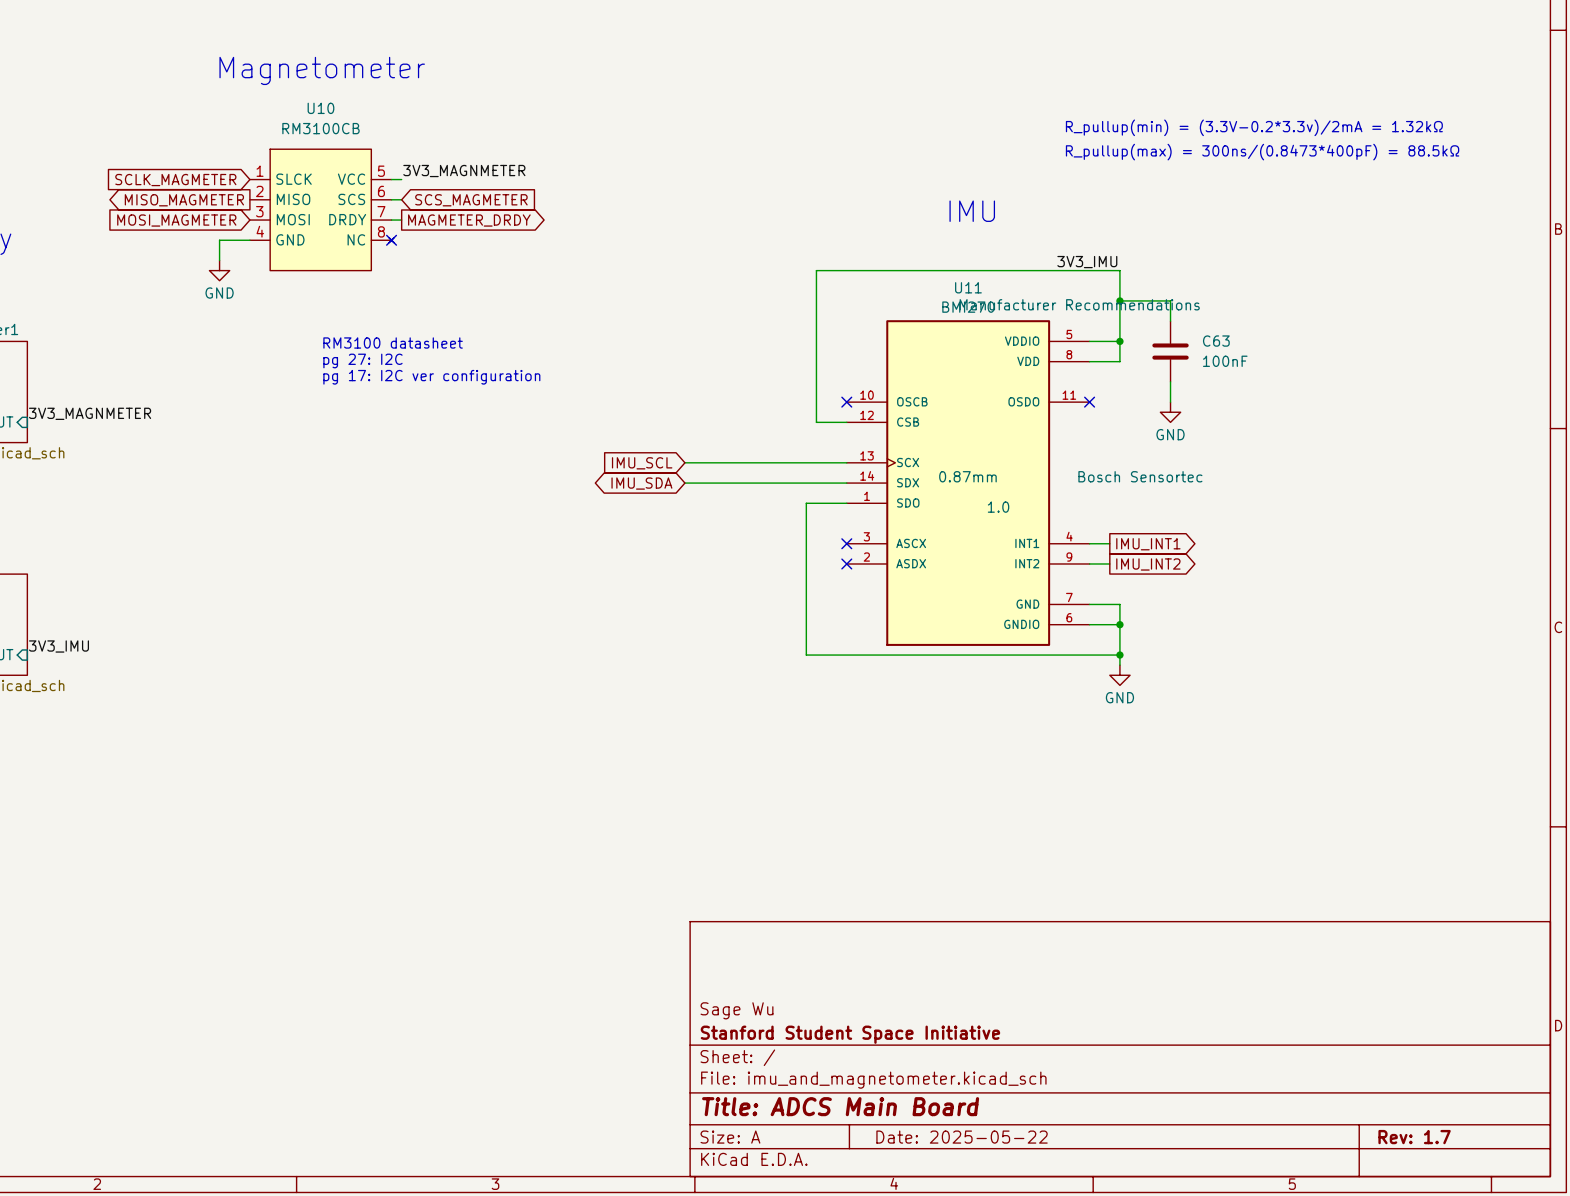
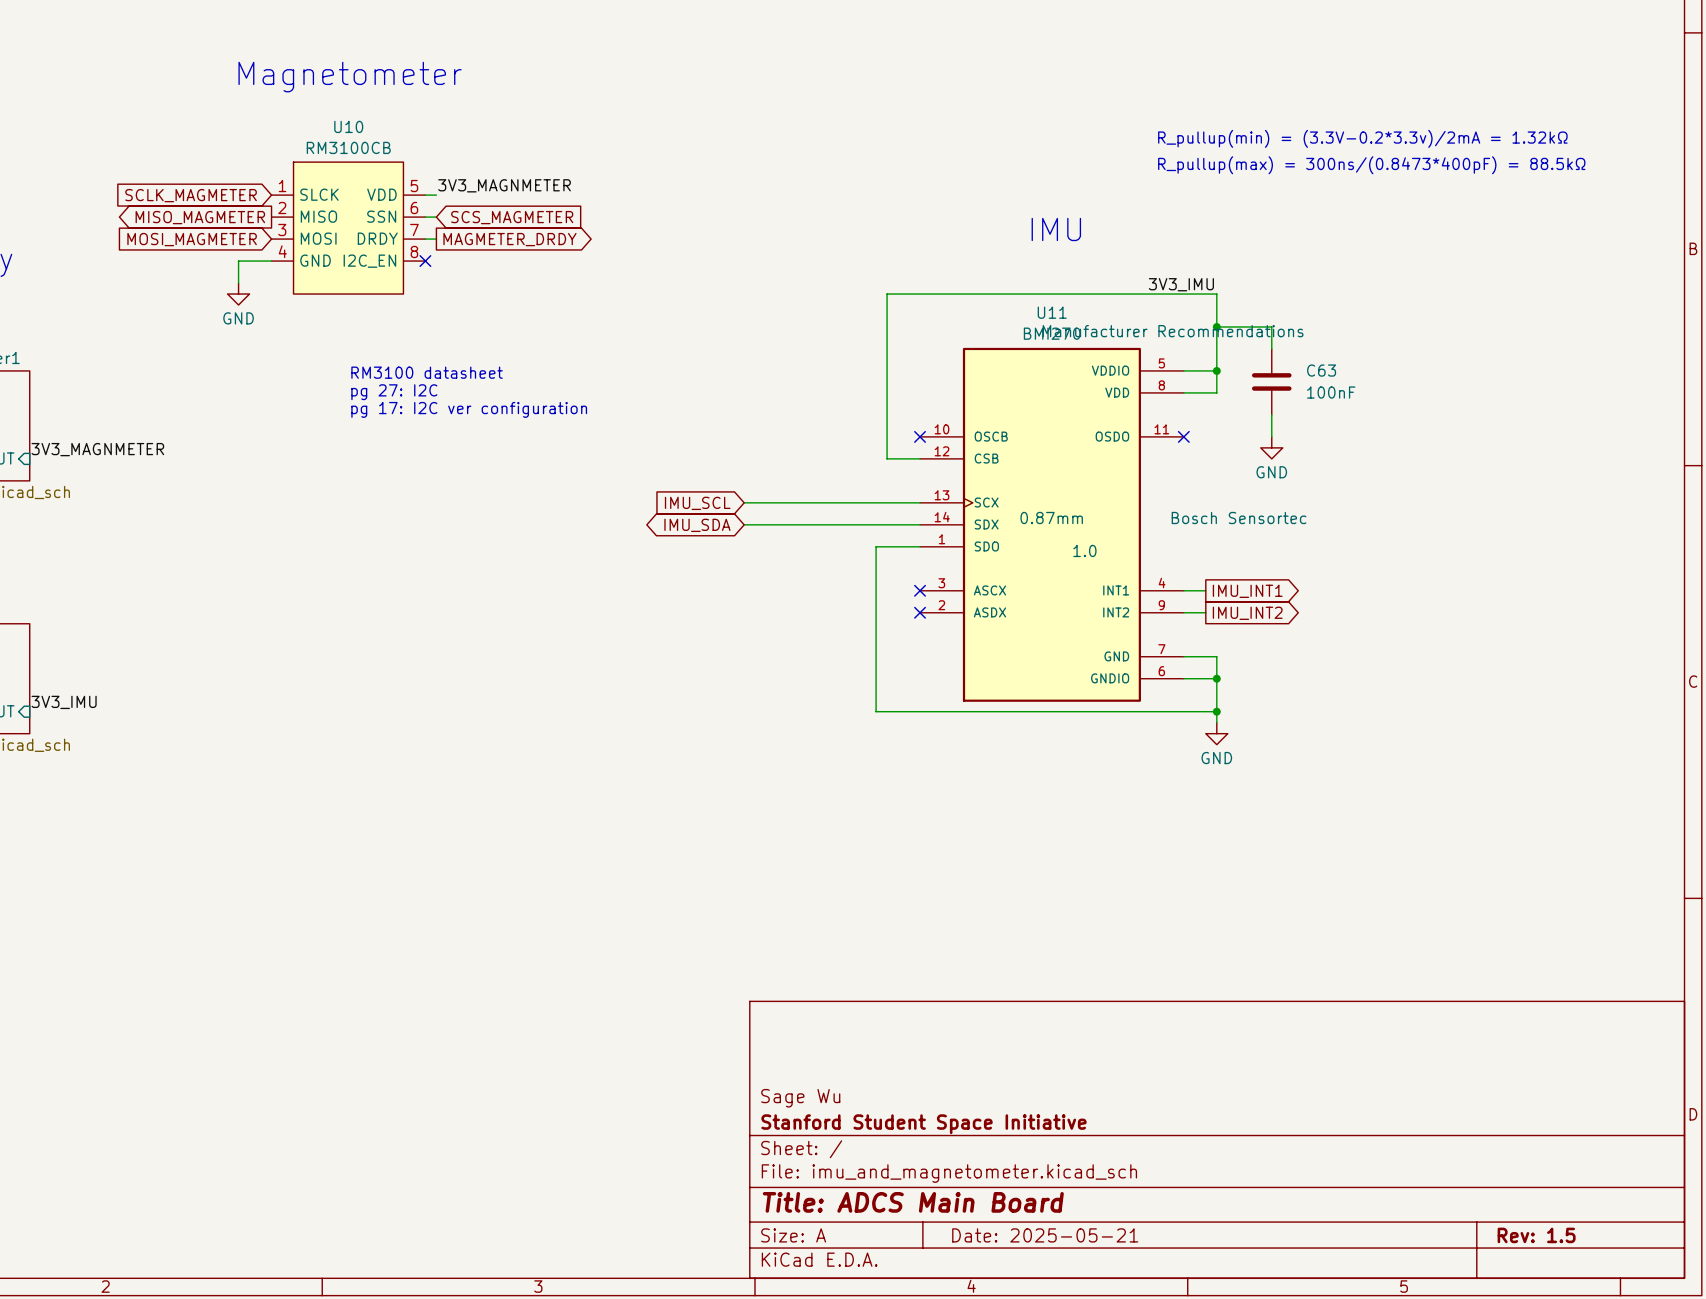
U10 symbol: [249, 149, 394, 271] -> [271, 162, 426, 295]
title block: Date: 2025-05-22 (962, 1137) -> Date: 2025-05-21 (1045, 1235)
title block: Rev: 1.7 (1414, 1137) -> Rev: 1.5 (1536, 1235)

